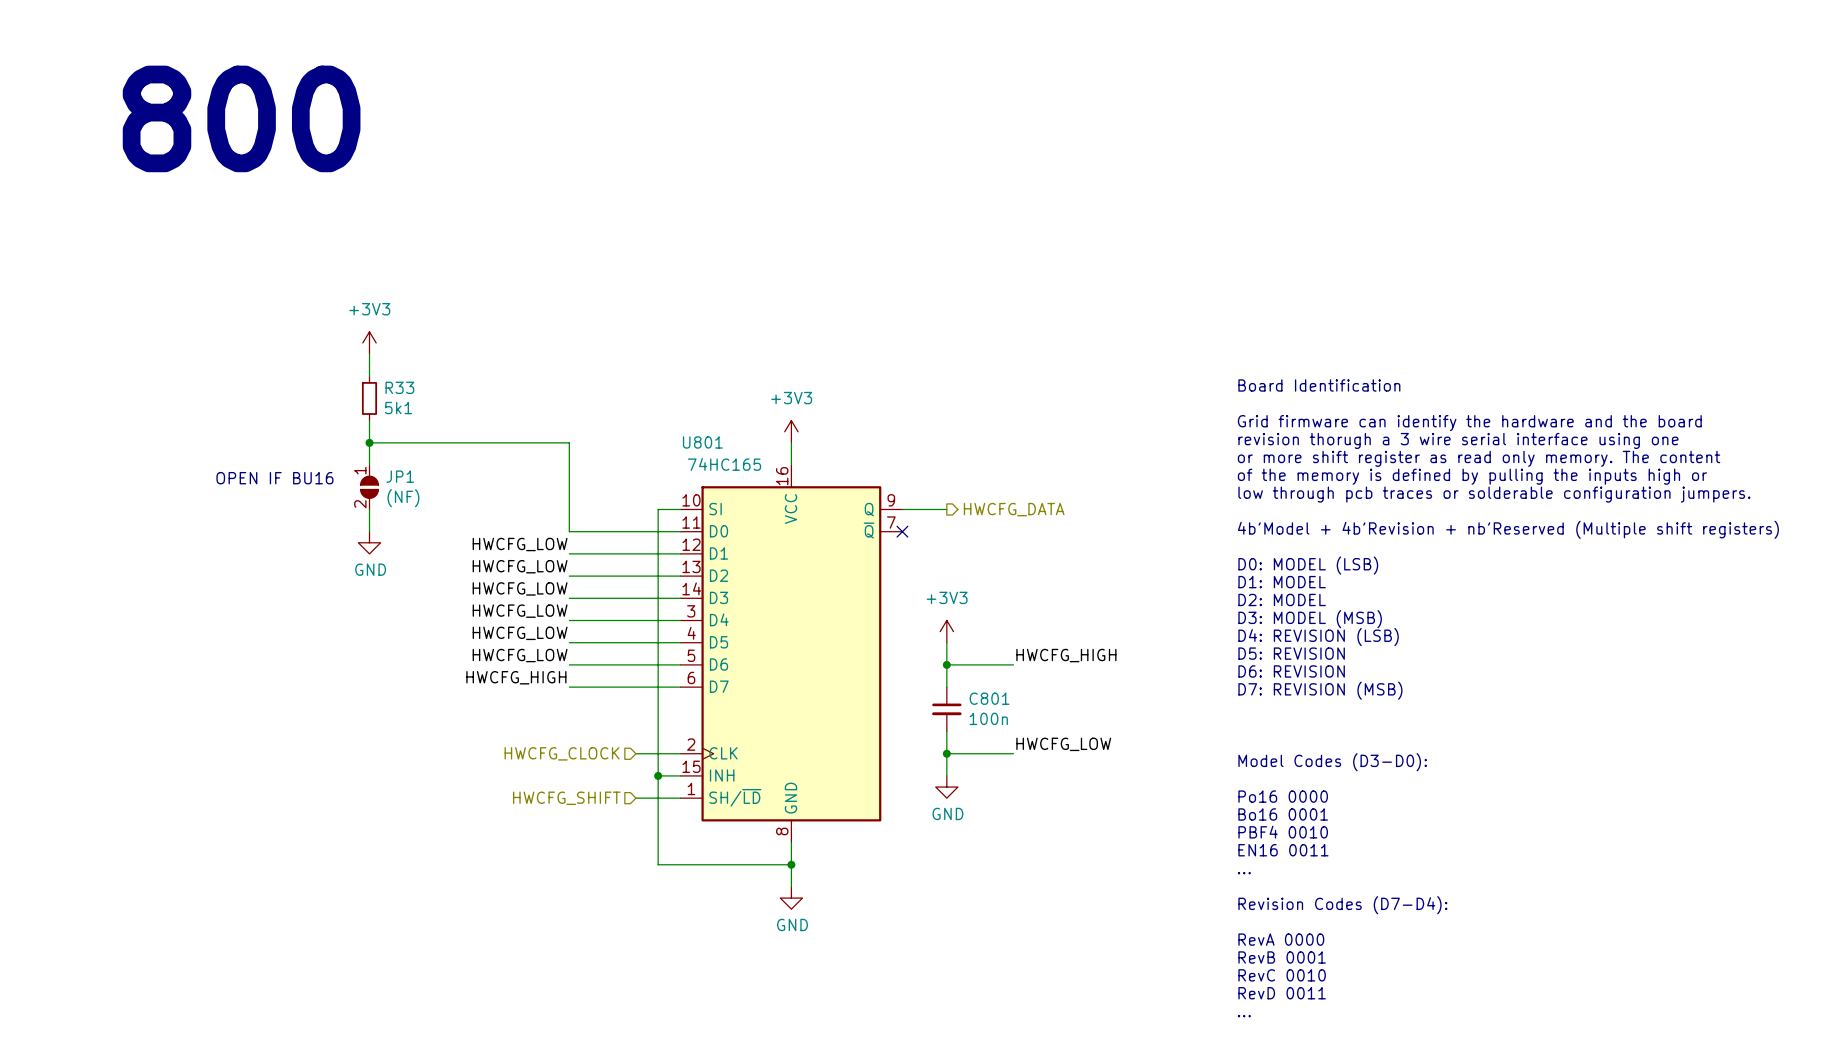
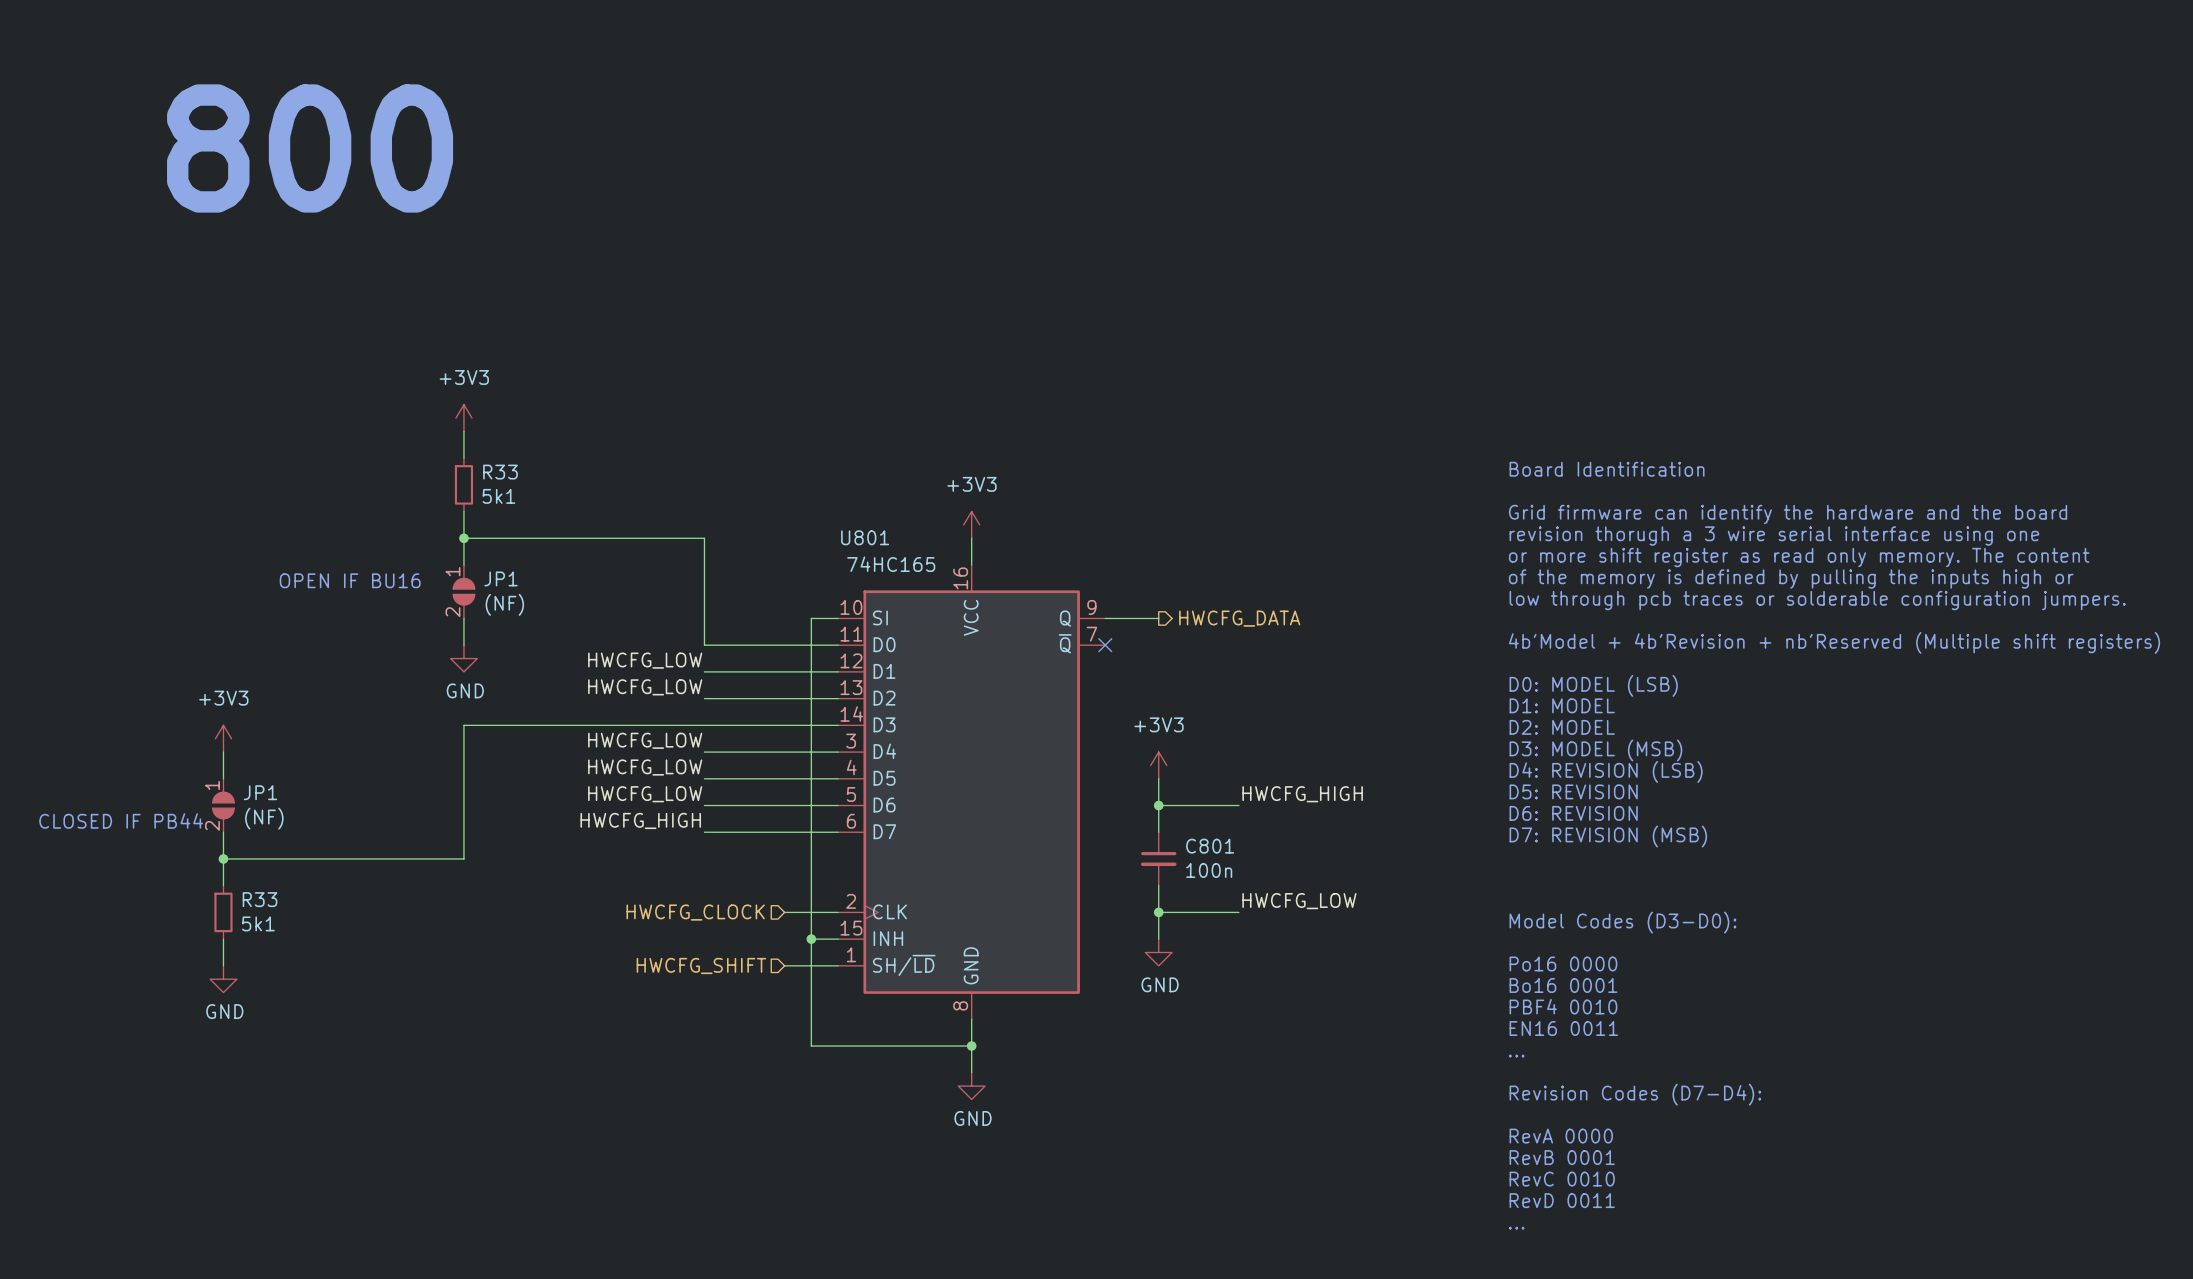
label: HWCFG_LOW (520, 588) -> none
wire: none -> (704, 725) (463, 725) (463, 858) (223, 858)
power symbol: none -> +3V3 (223, 738)
wire: none -> (223, 752) (223, 778)
JP1: none -> (NF) (223, 805)
text: none -> CLOSED IF PB44 (121, 820)
wire: none -> (223, 832) (223, 885)
junction: none -> (223, 858)
R33: none -> 5k1 (223, 912)
wire: none -> (223, 939) (223, 965)
power symbol: none -> GND (223, 979)

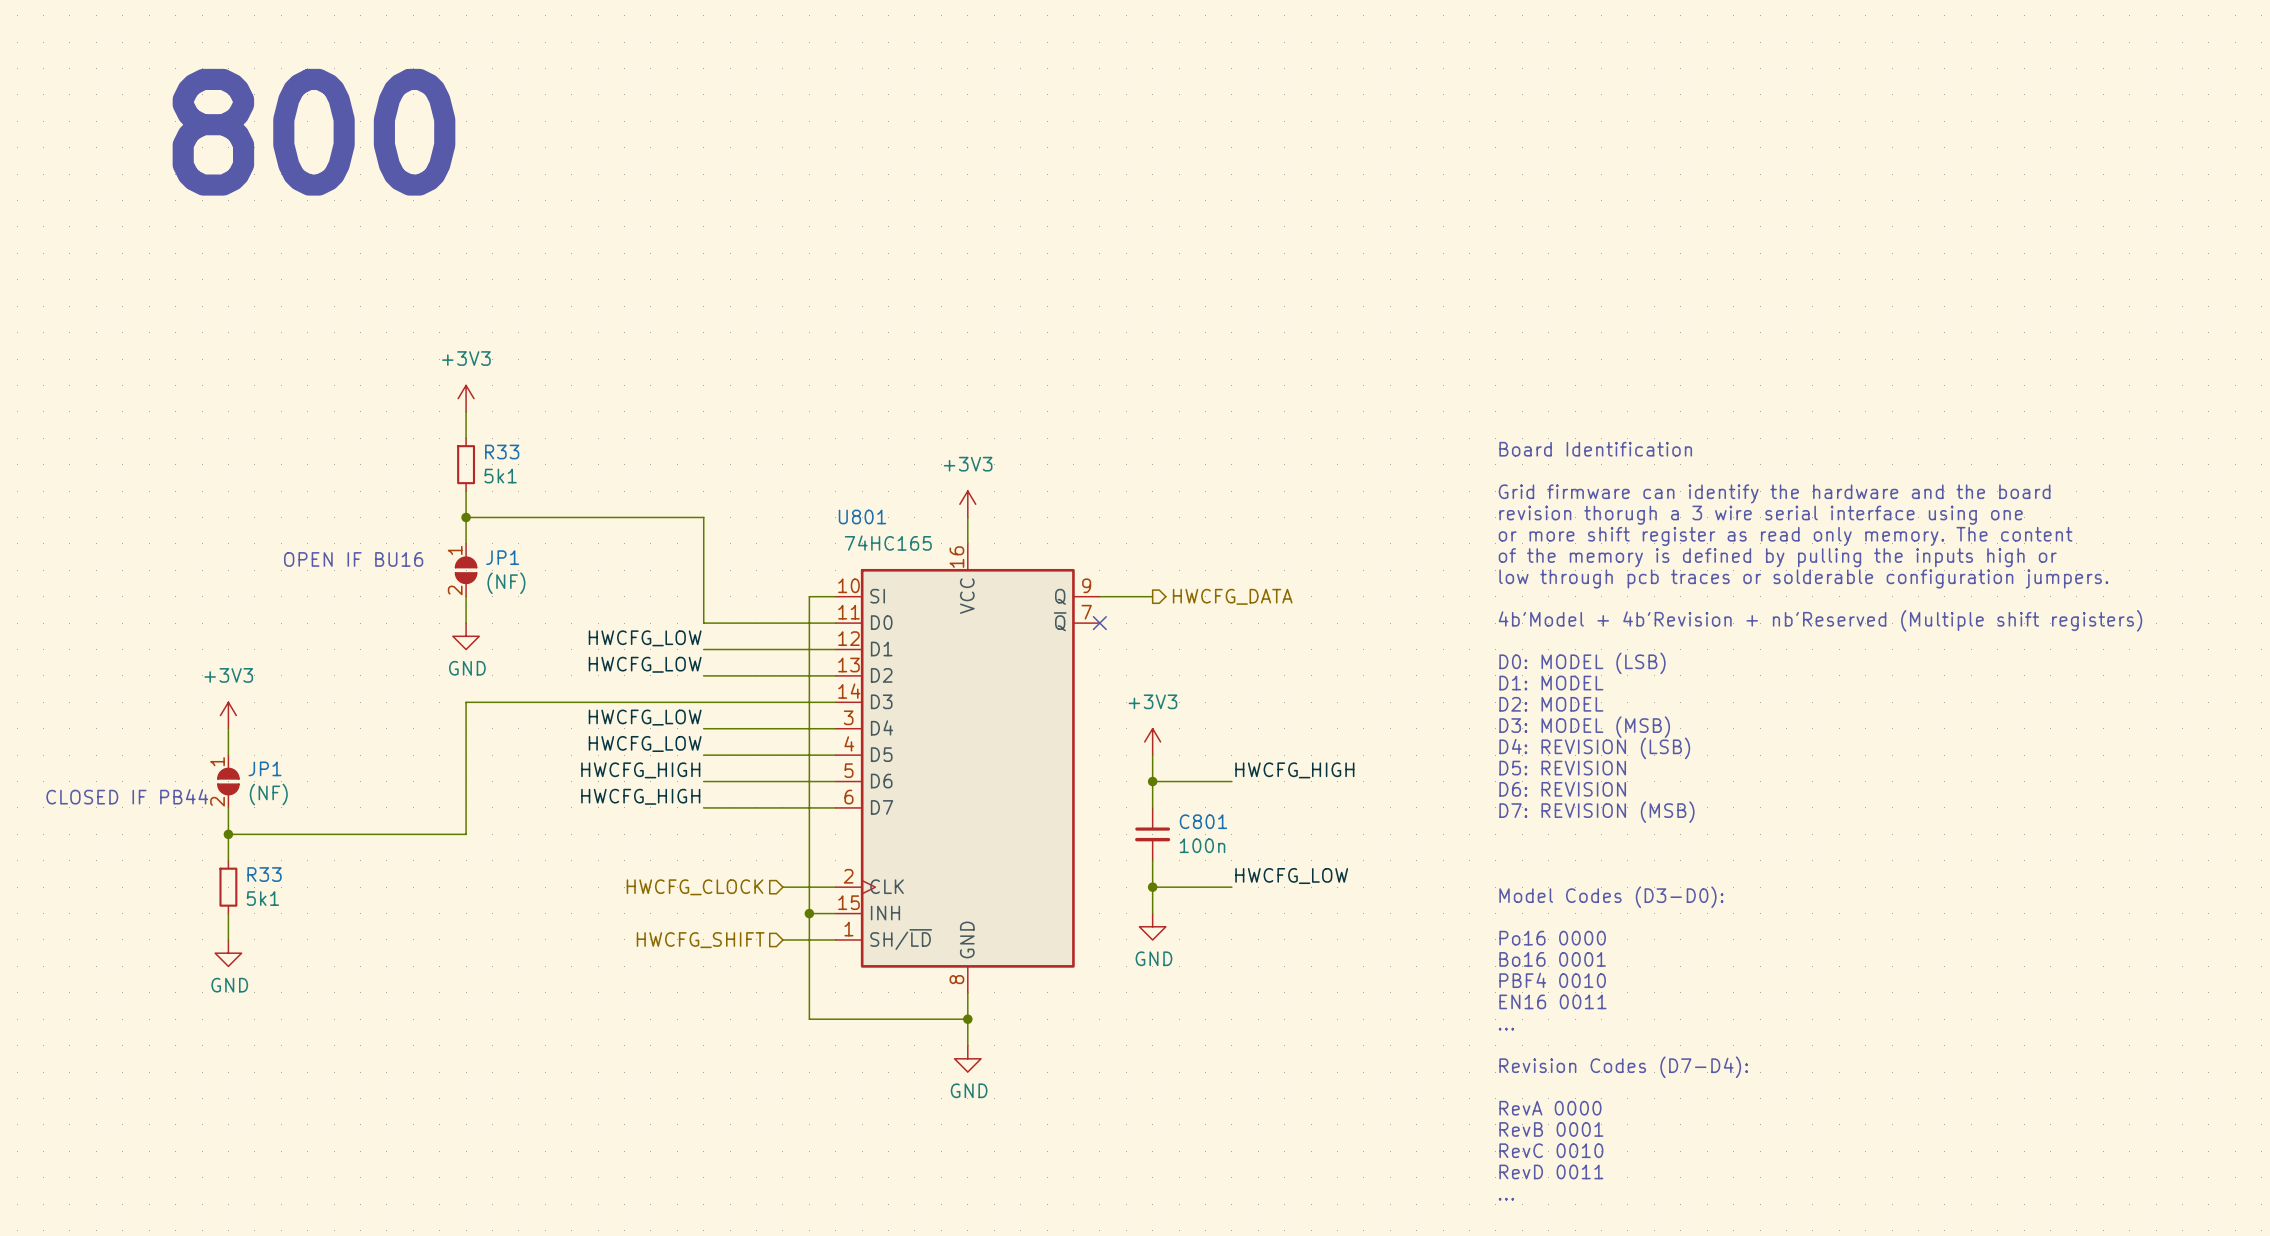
label: HWCFG_LOW (645, 794) -> HWCFG_HIGH (640, 770)

